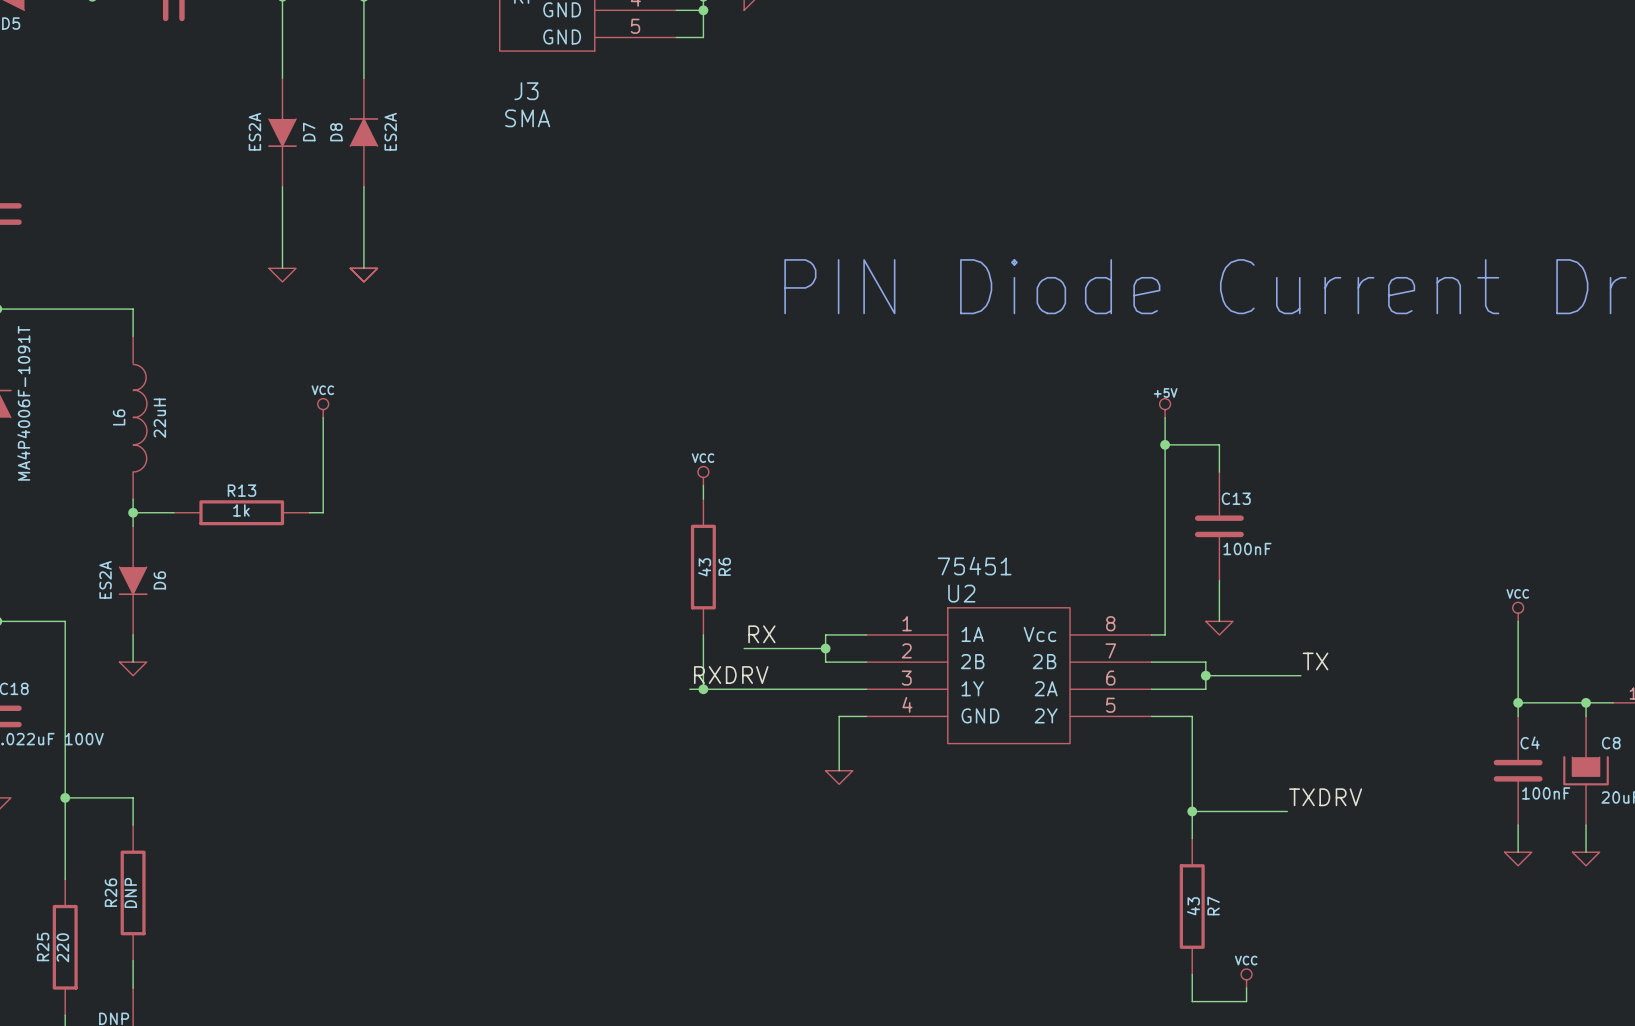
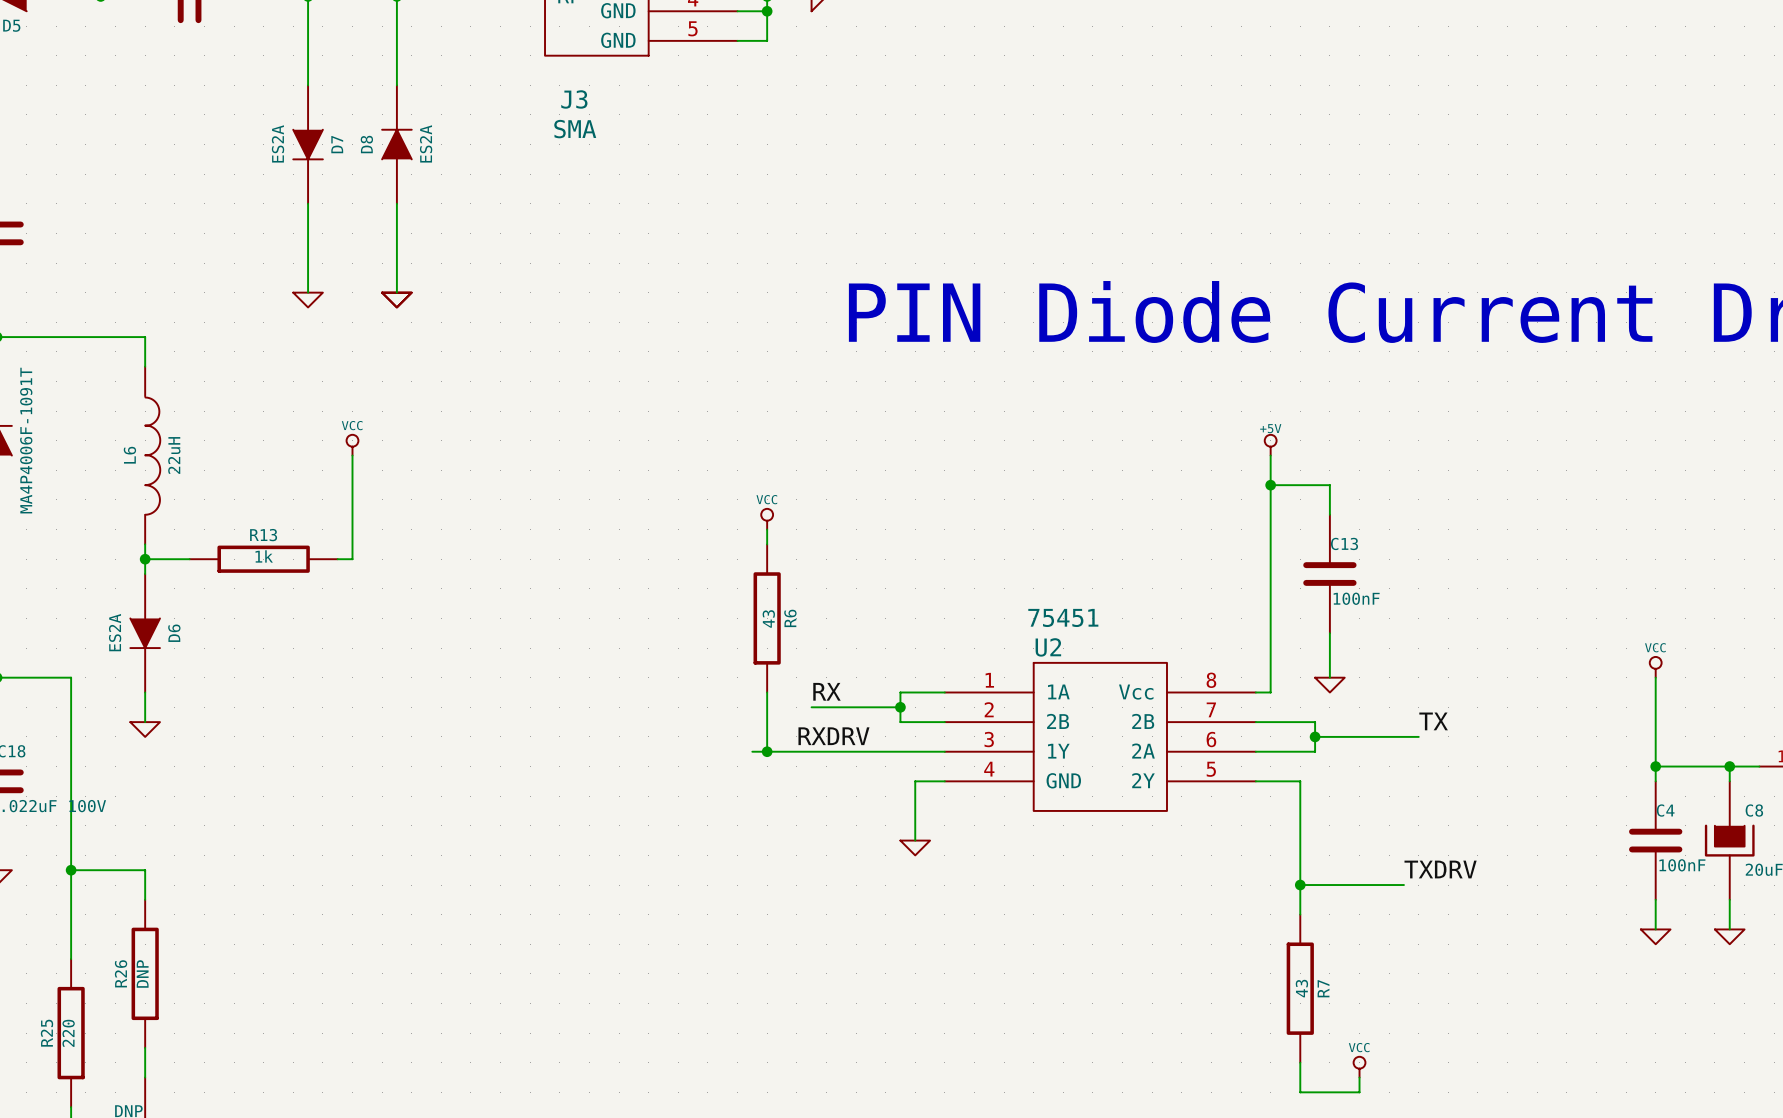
label position: RXDRV (731, 675) -> RXDRV (833, 736)

